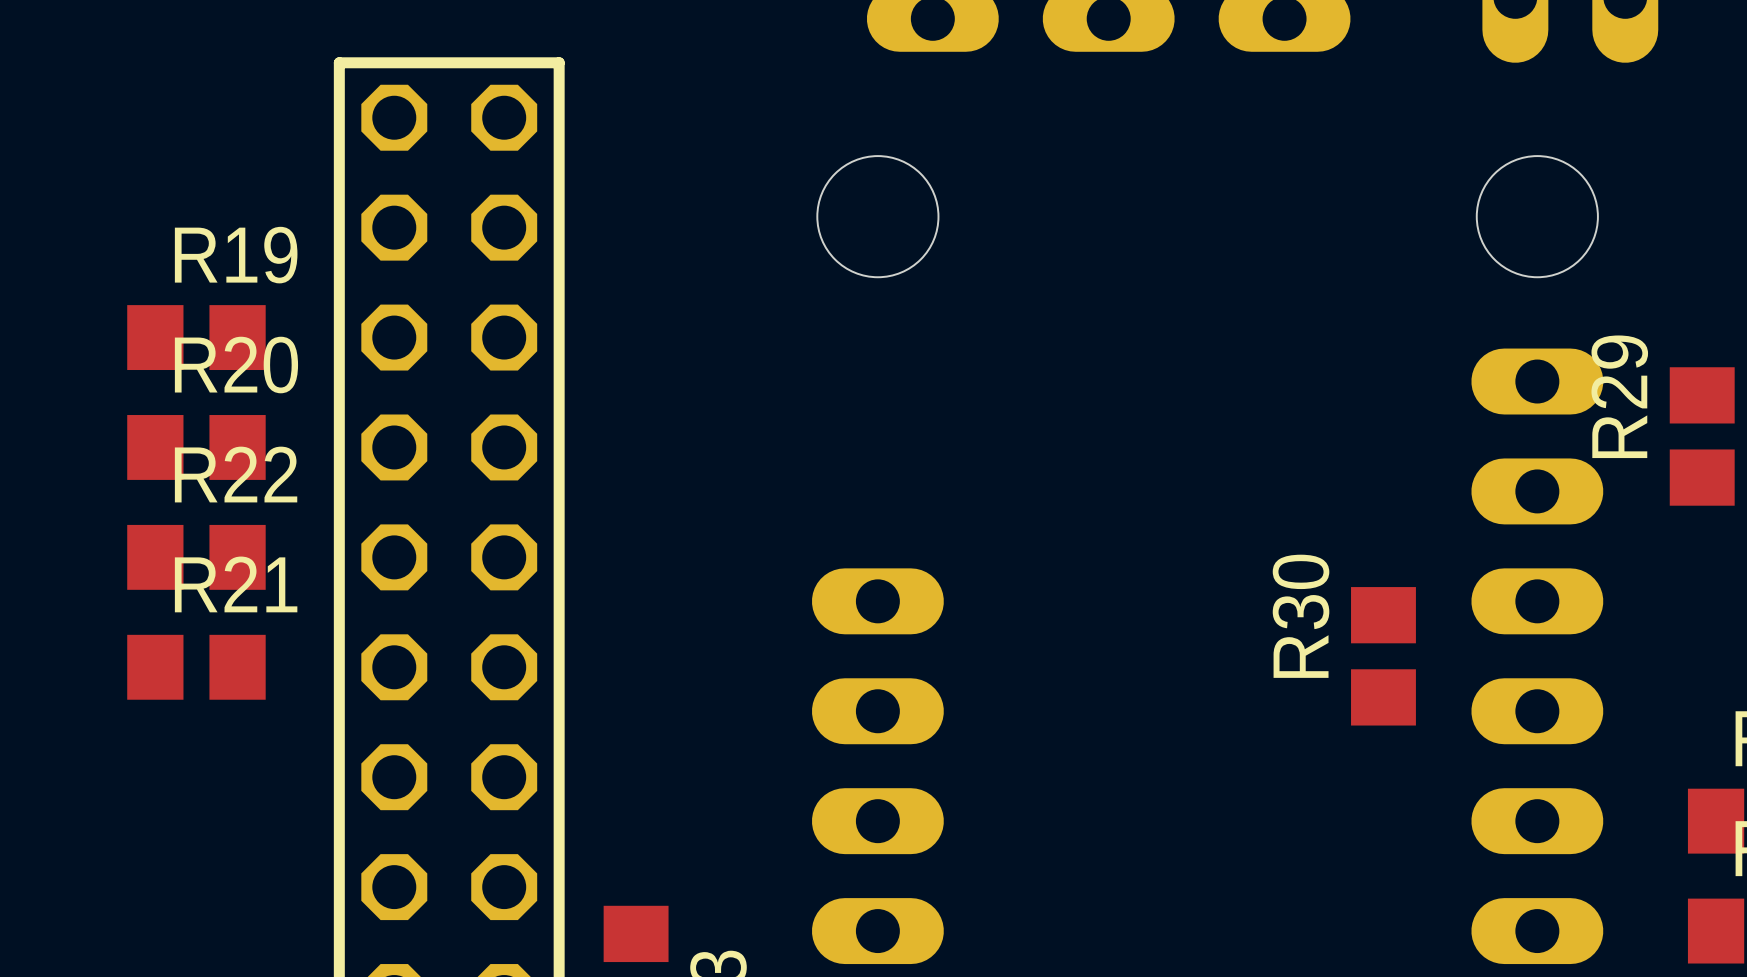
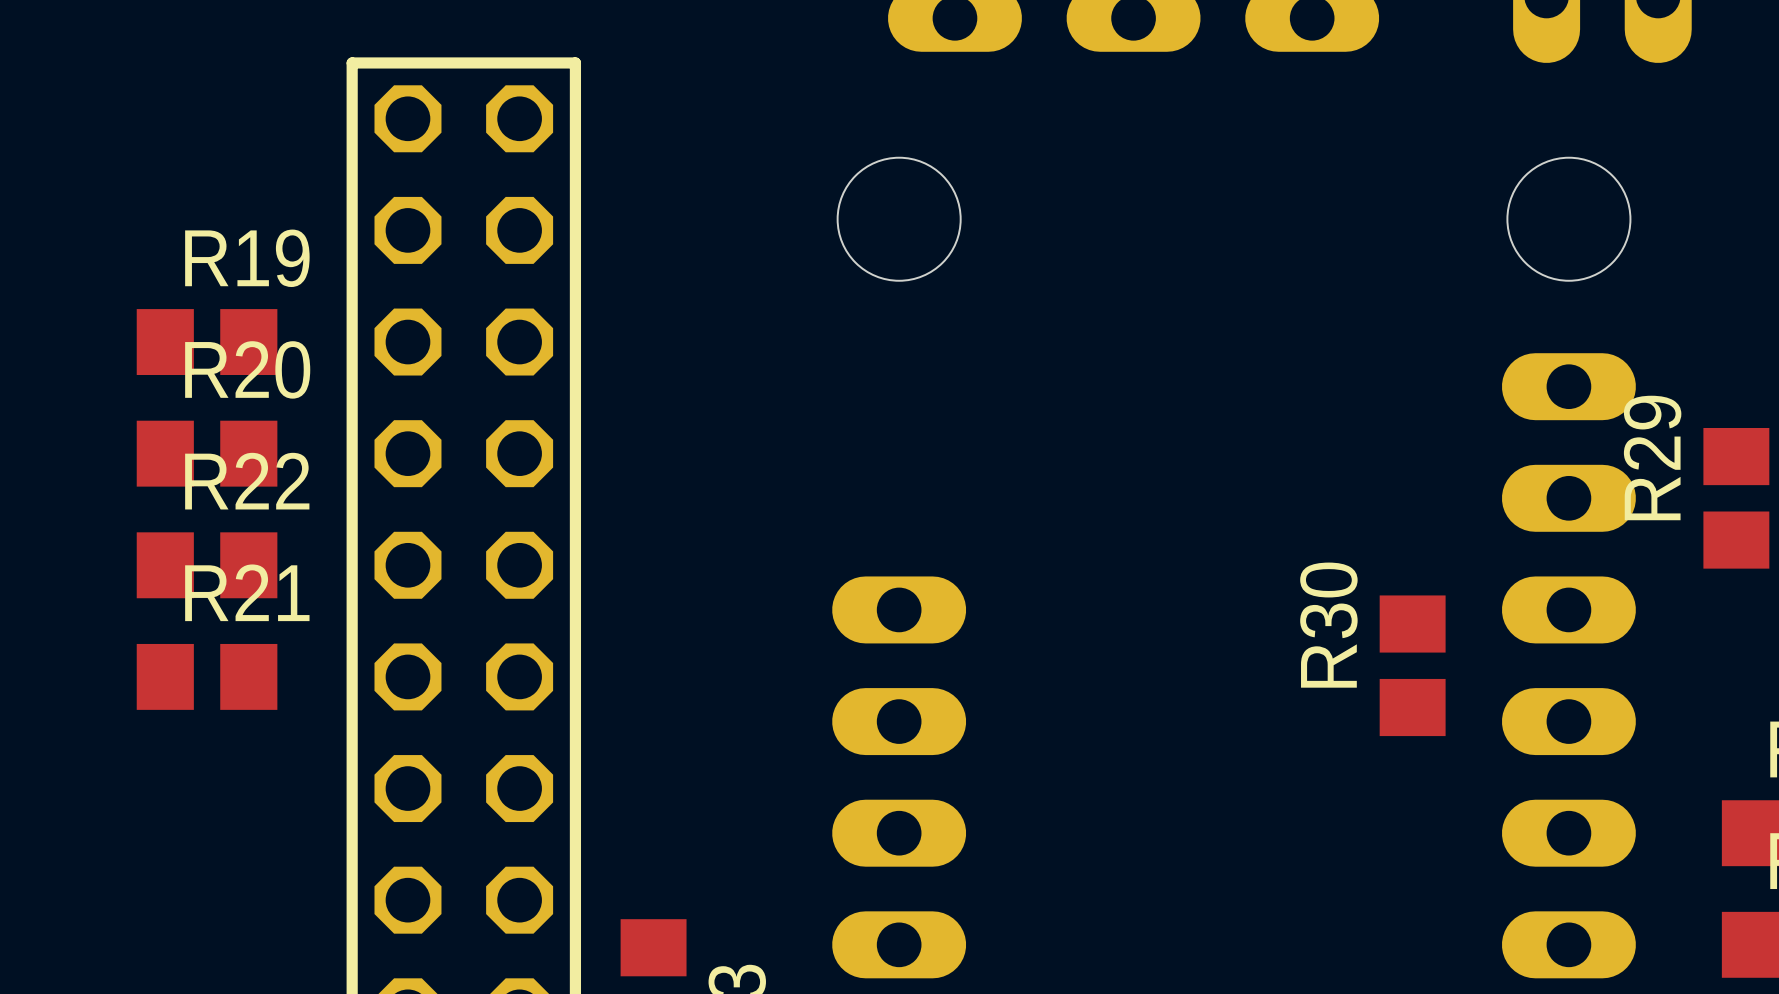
R29 position: (1702, 436) -> (1736, 498)

